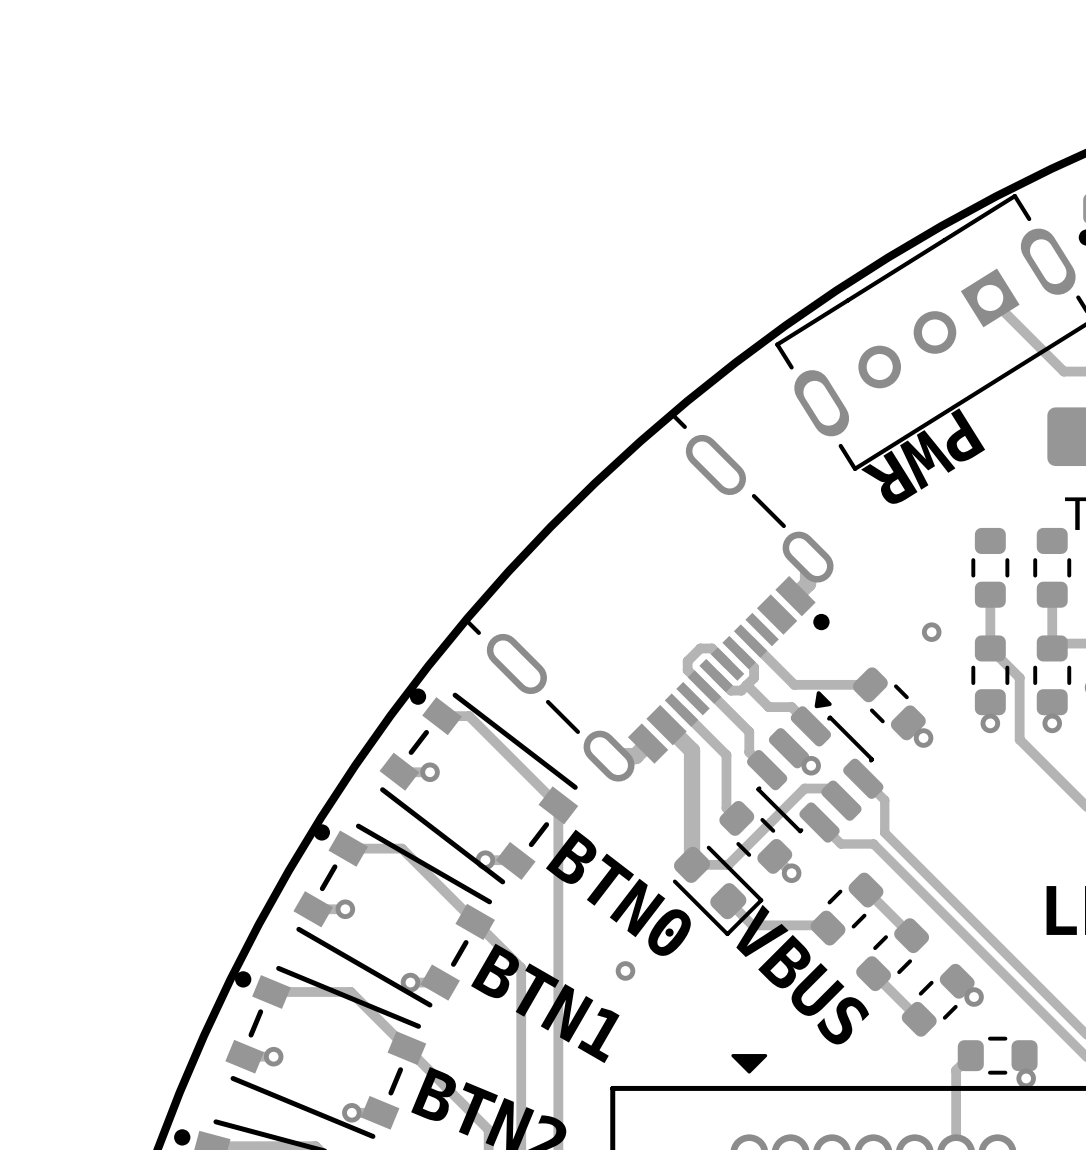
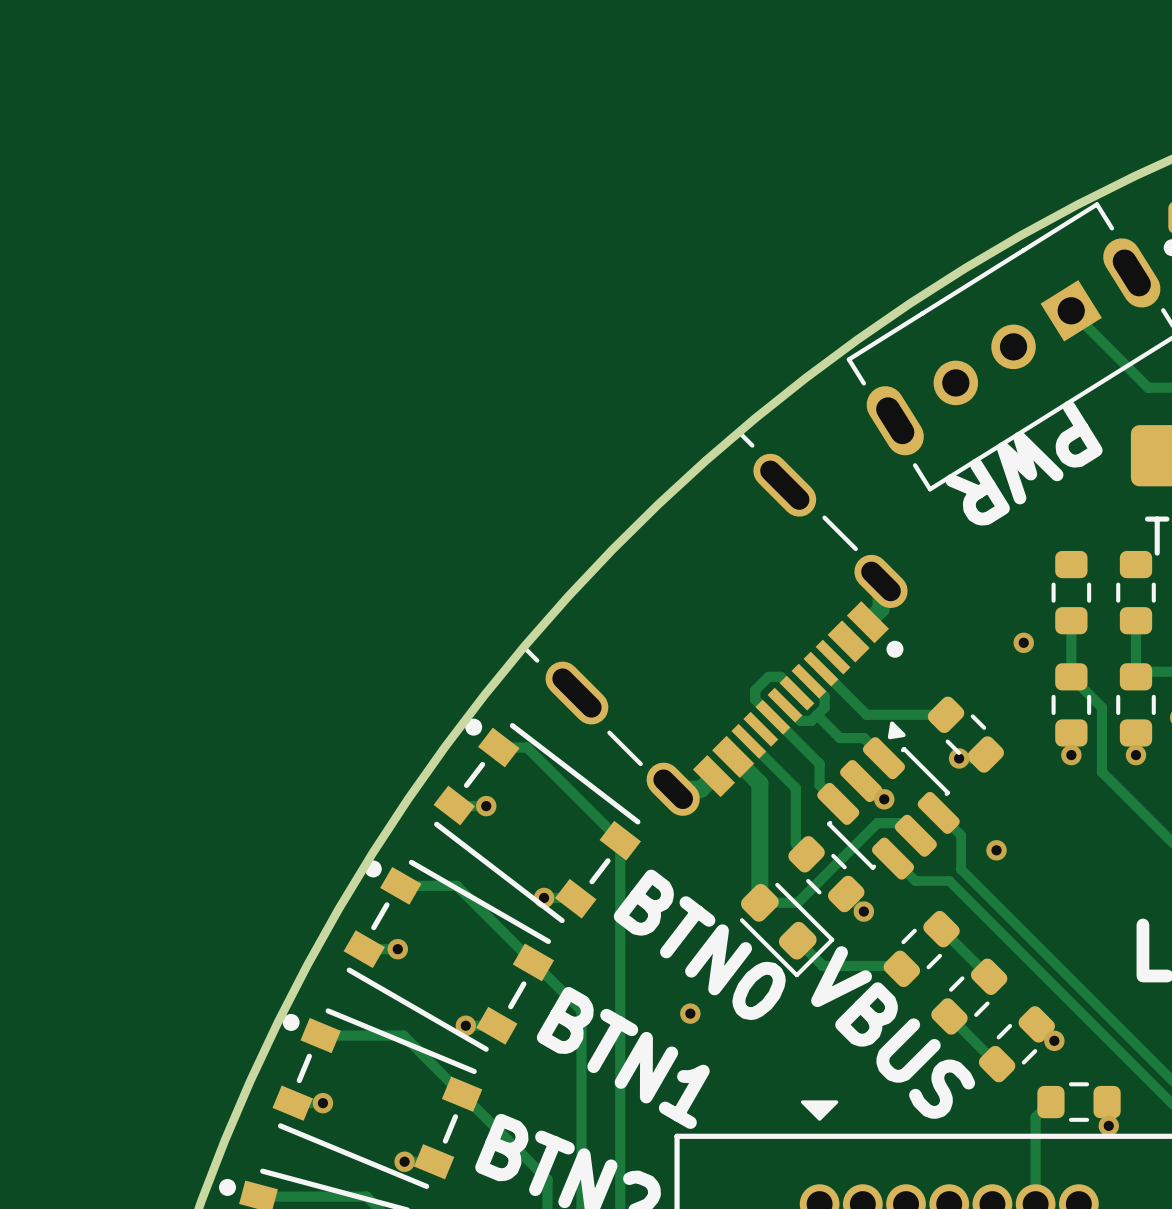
via position: (931, 632) -> (1023, 642)
via: none -> (959, 758)
via: (923, 738) -> none
via: none -> (996, 850)

